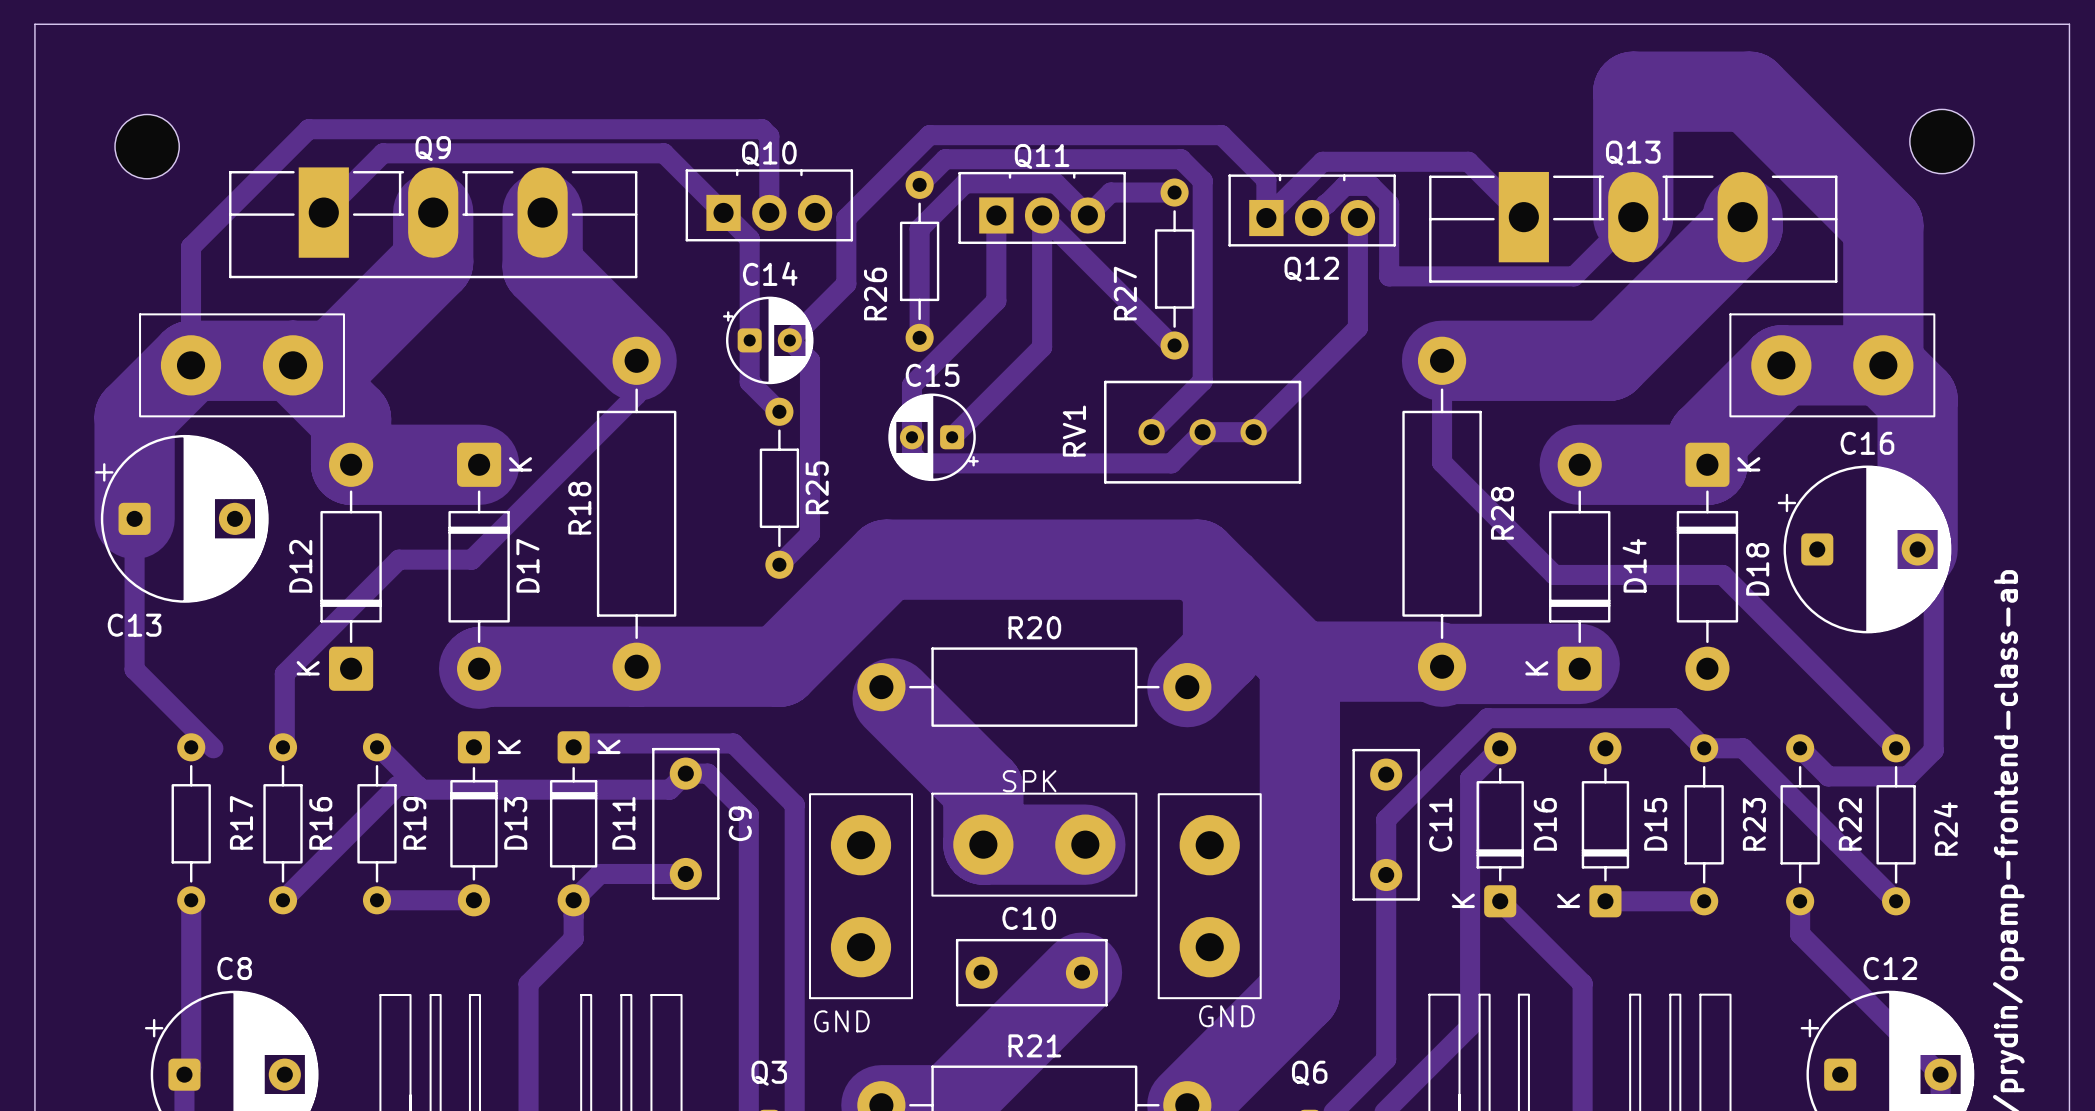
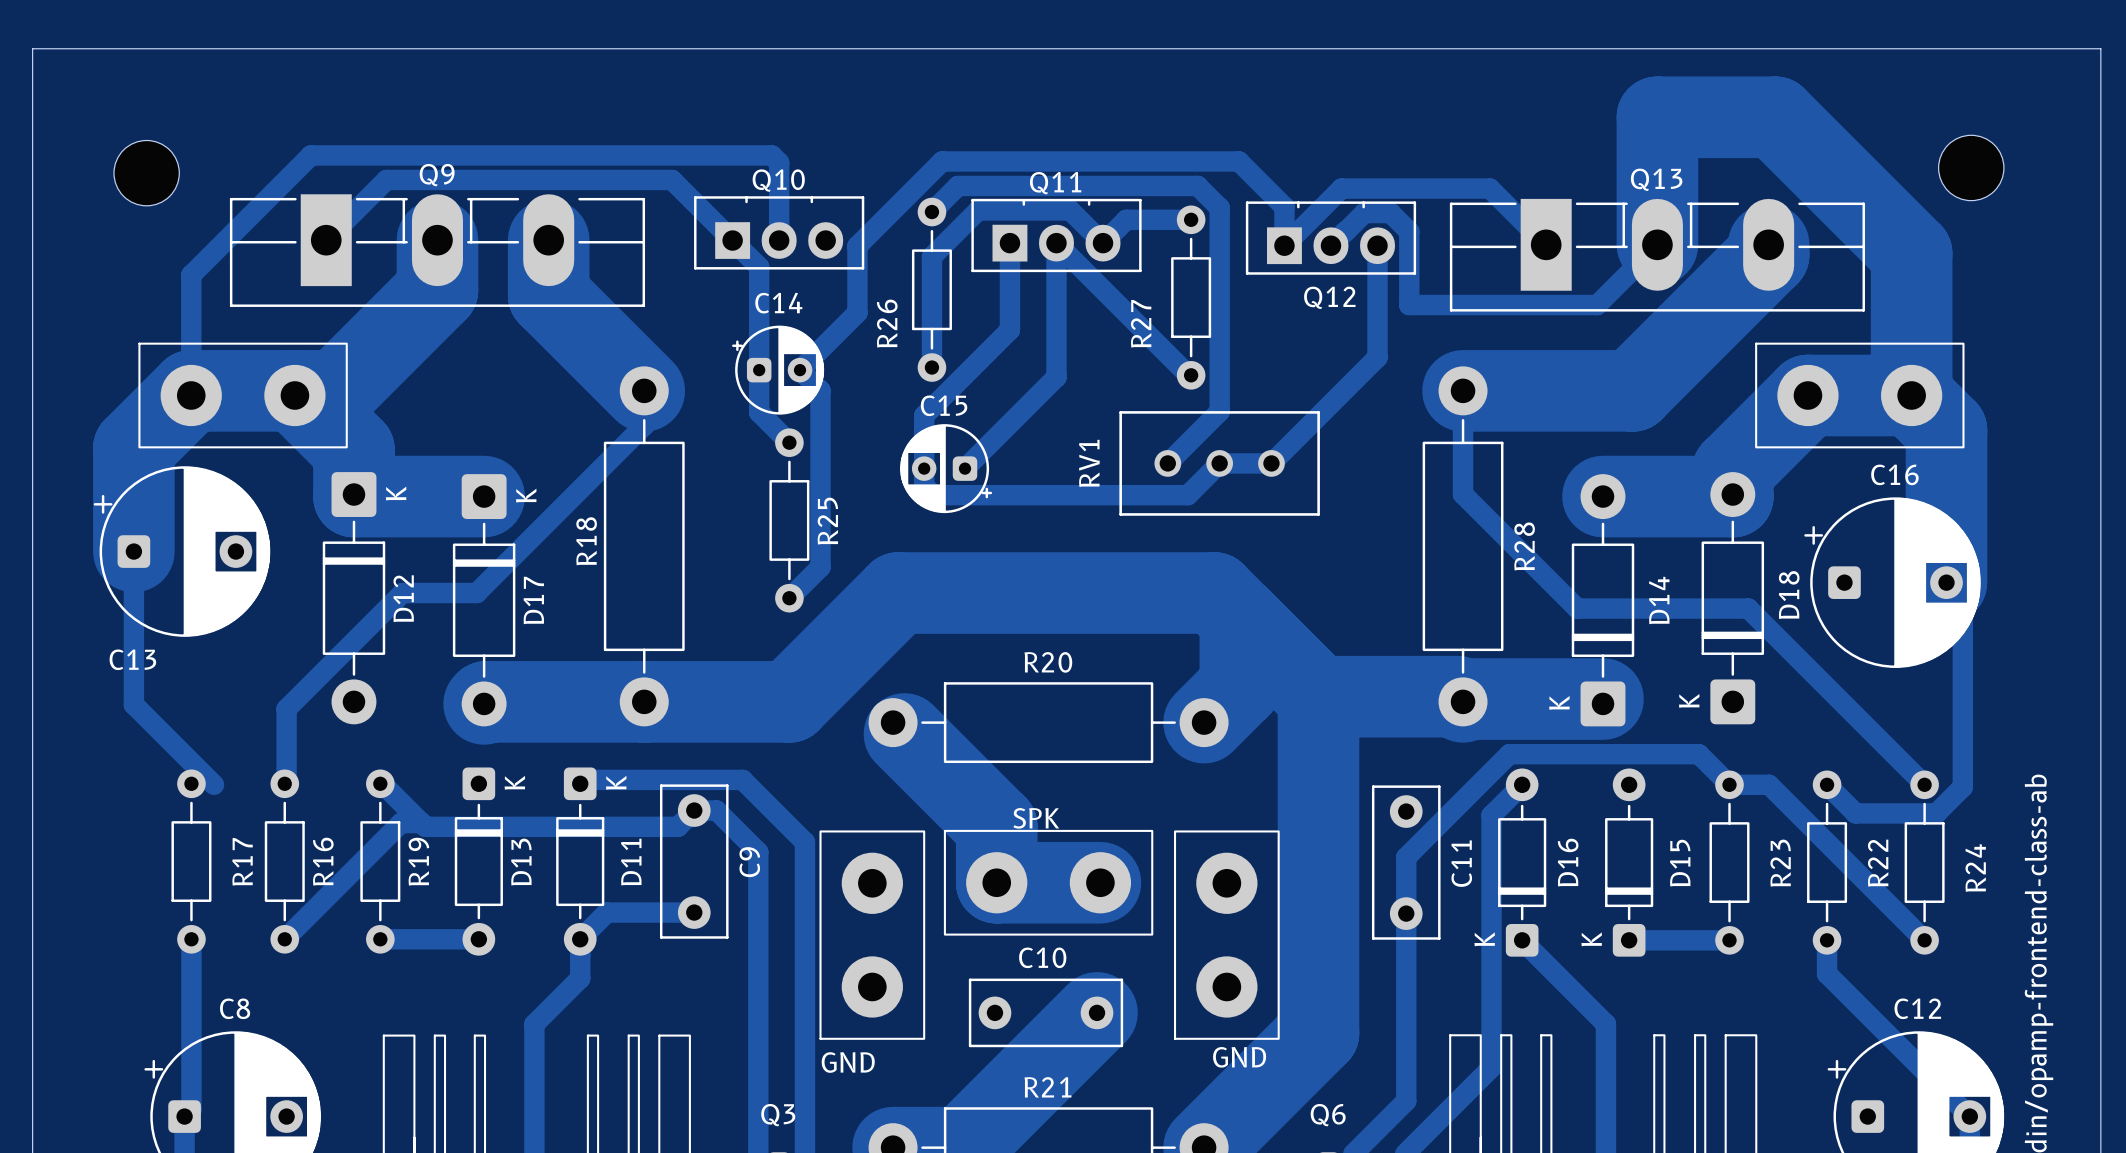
D12 rotation: 0° (351, 566) -> 180° (353, 598)
D18 rotation: 0° (1707, 566) -> 180° (1732, 598)

